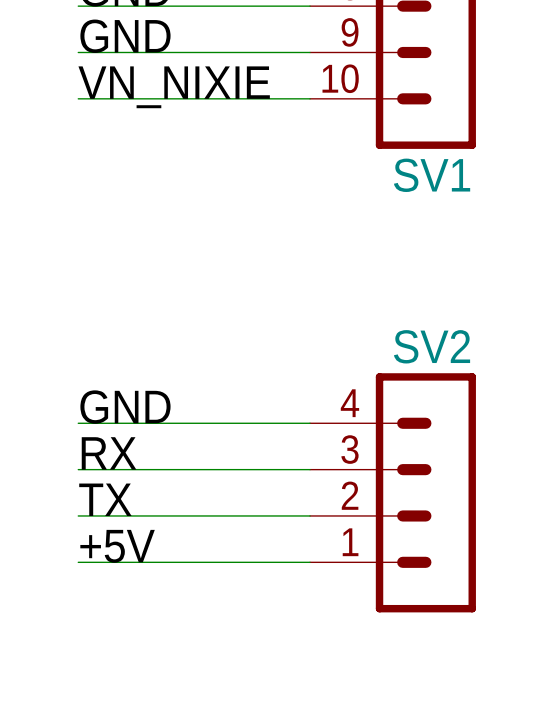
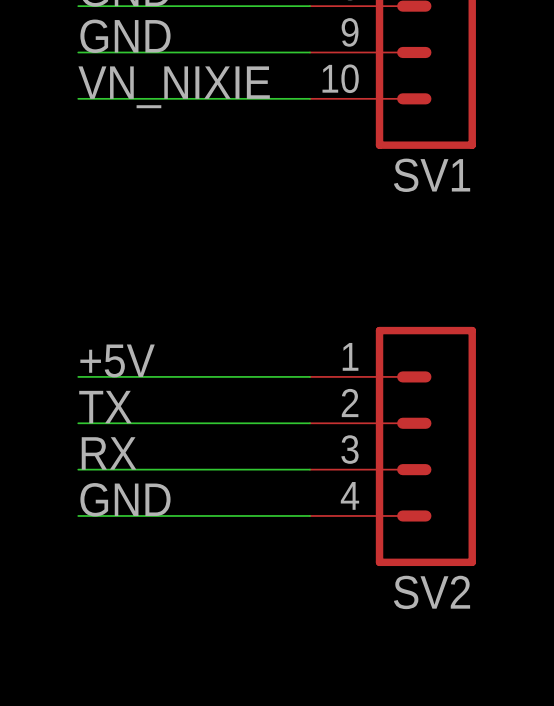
label: GND (125, 407) -> TX (105, 407)
SV2 flip: as is (425, 492) -> up-down (425, 446)
label: TX (105, 499) -> GND (125, 499)
label position: +5V (117, 546) -> +5V (117, 360)
wire: (78, 562) (310, 562) -> (78, 376) (310, 376)

